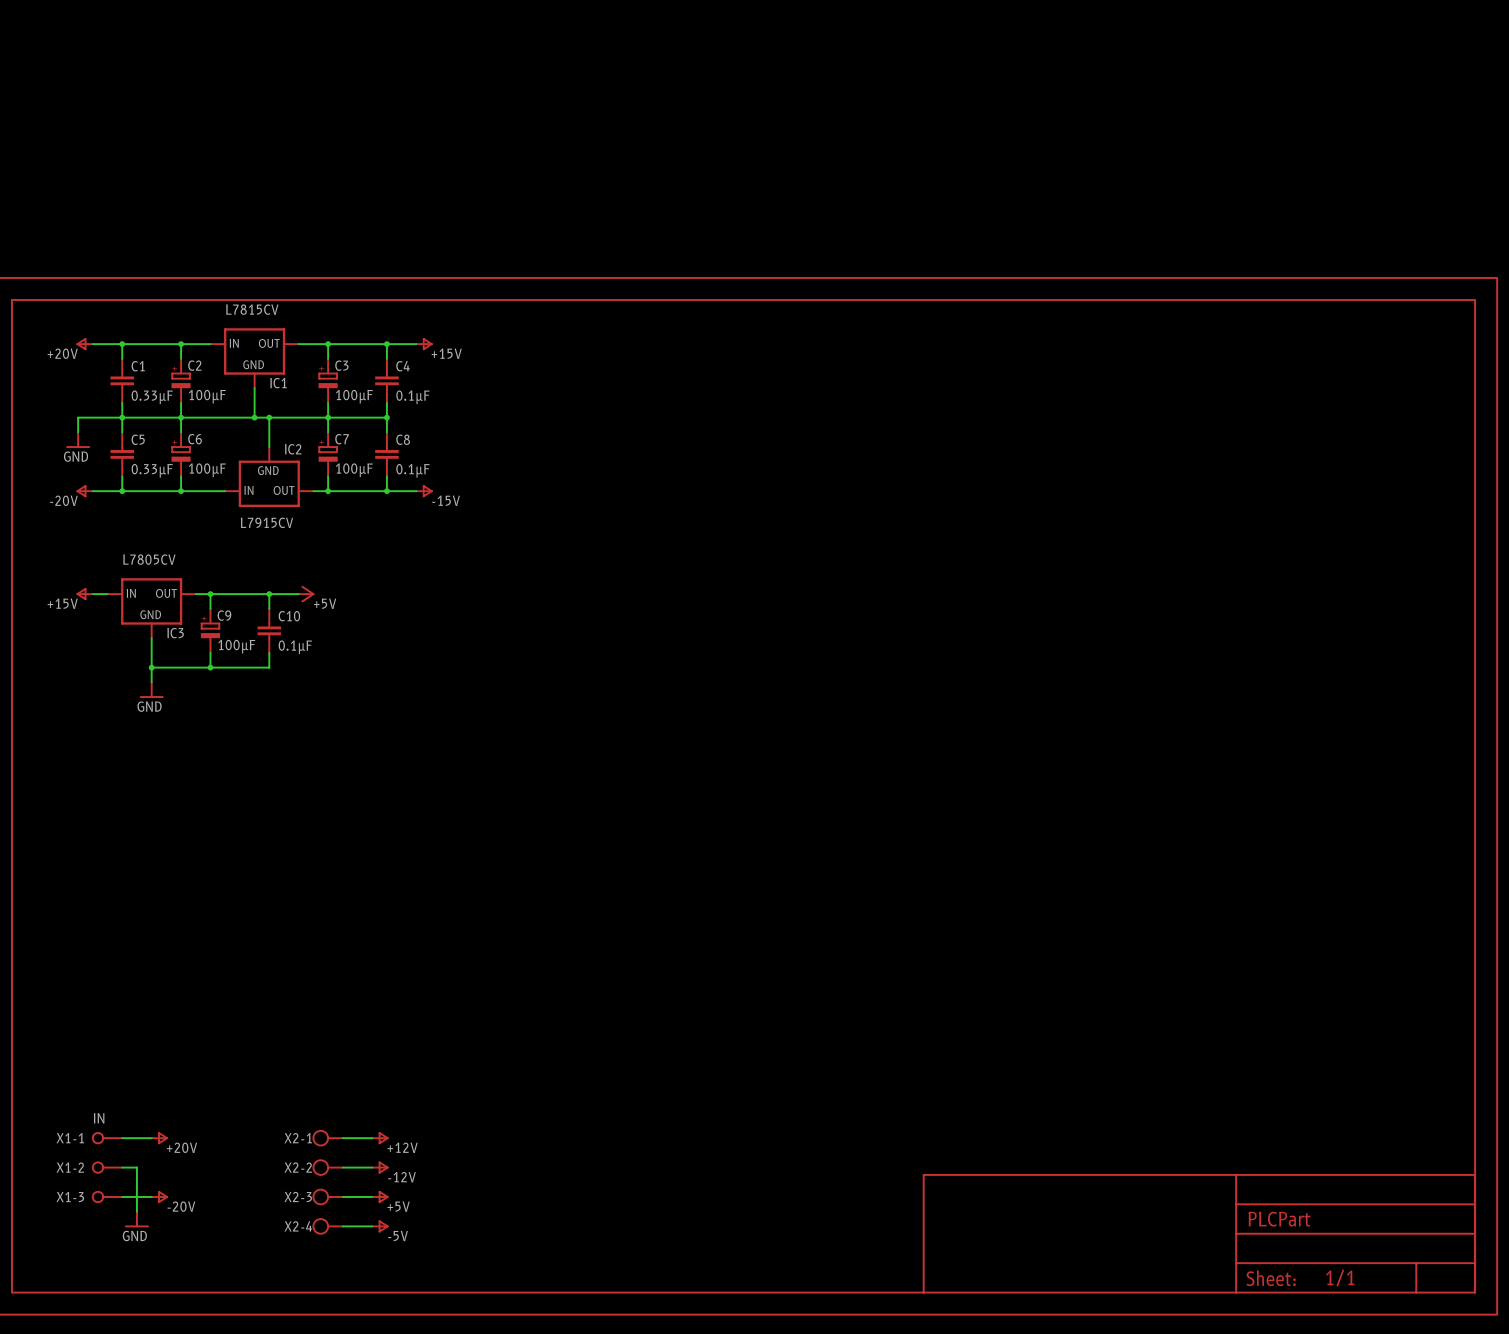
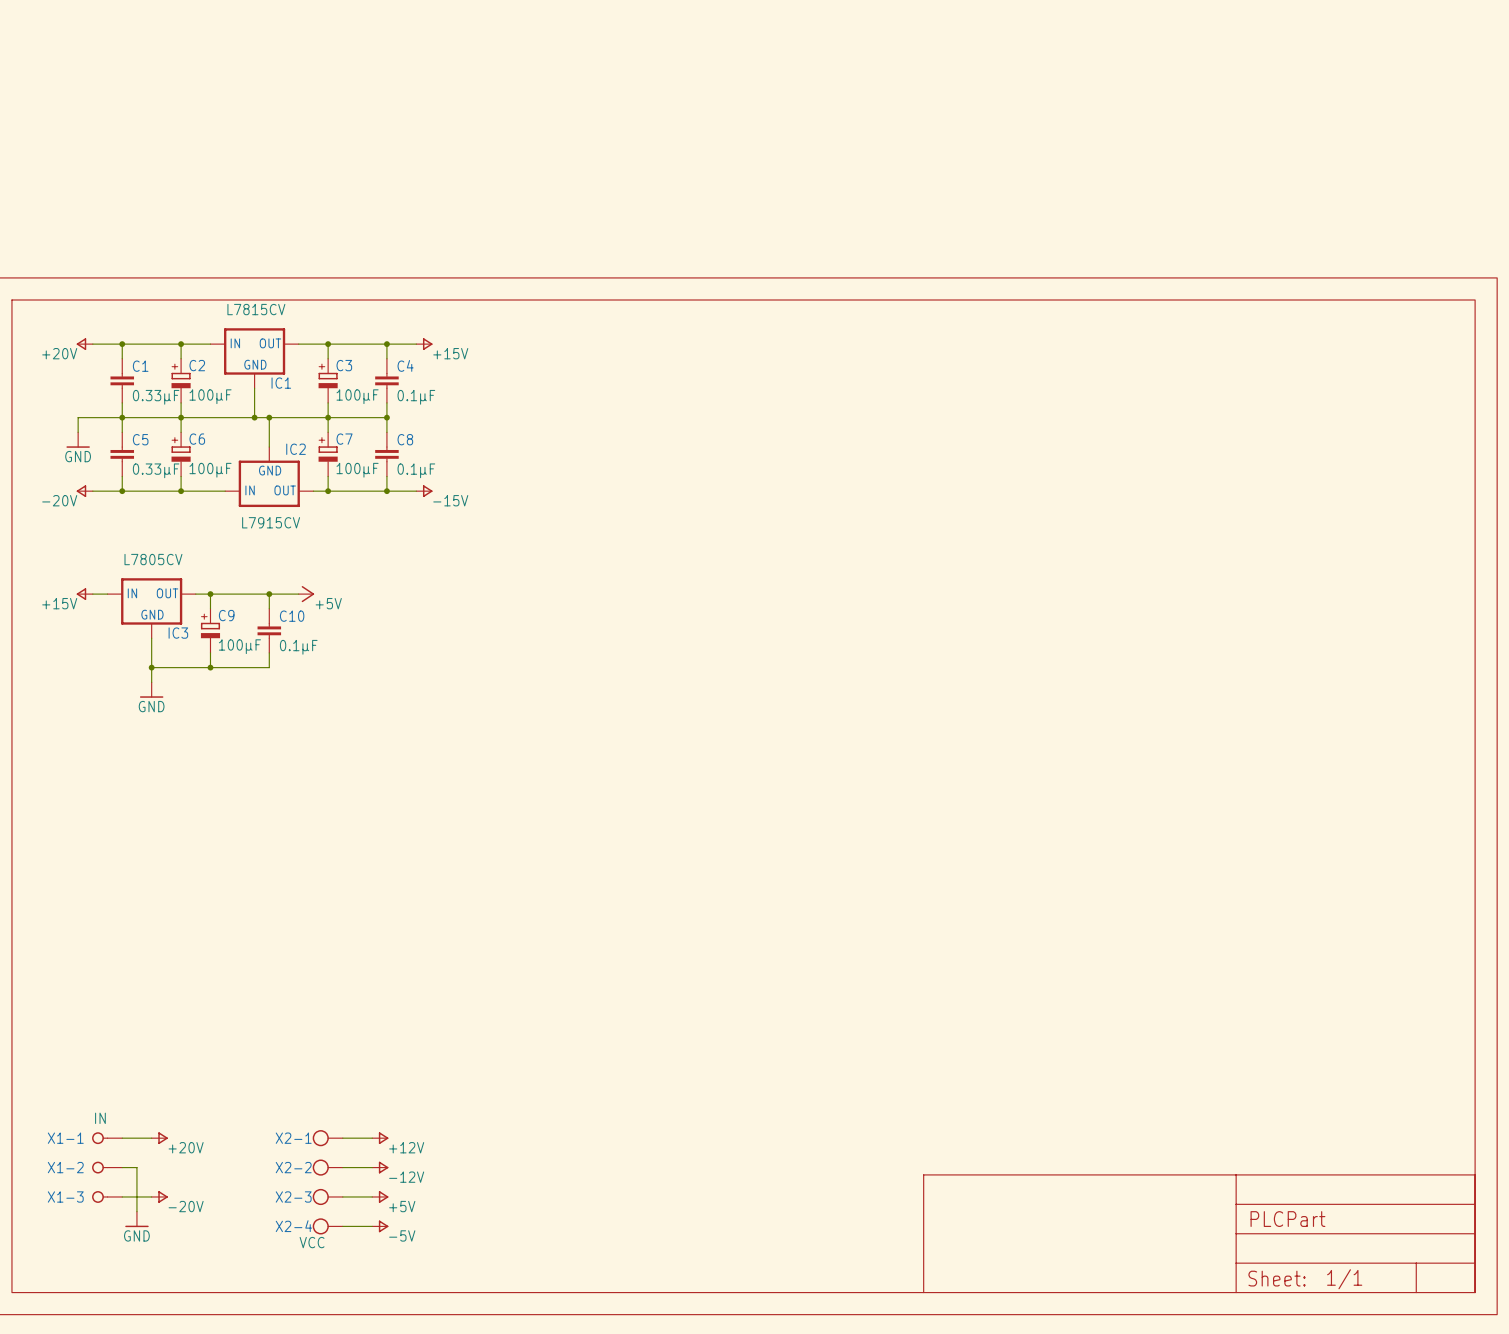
X2-4 value: none -> VCC (312, 1242)

